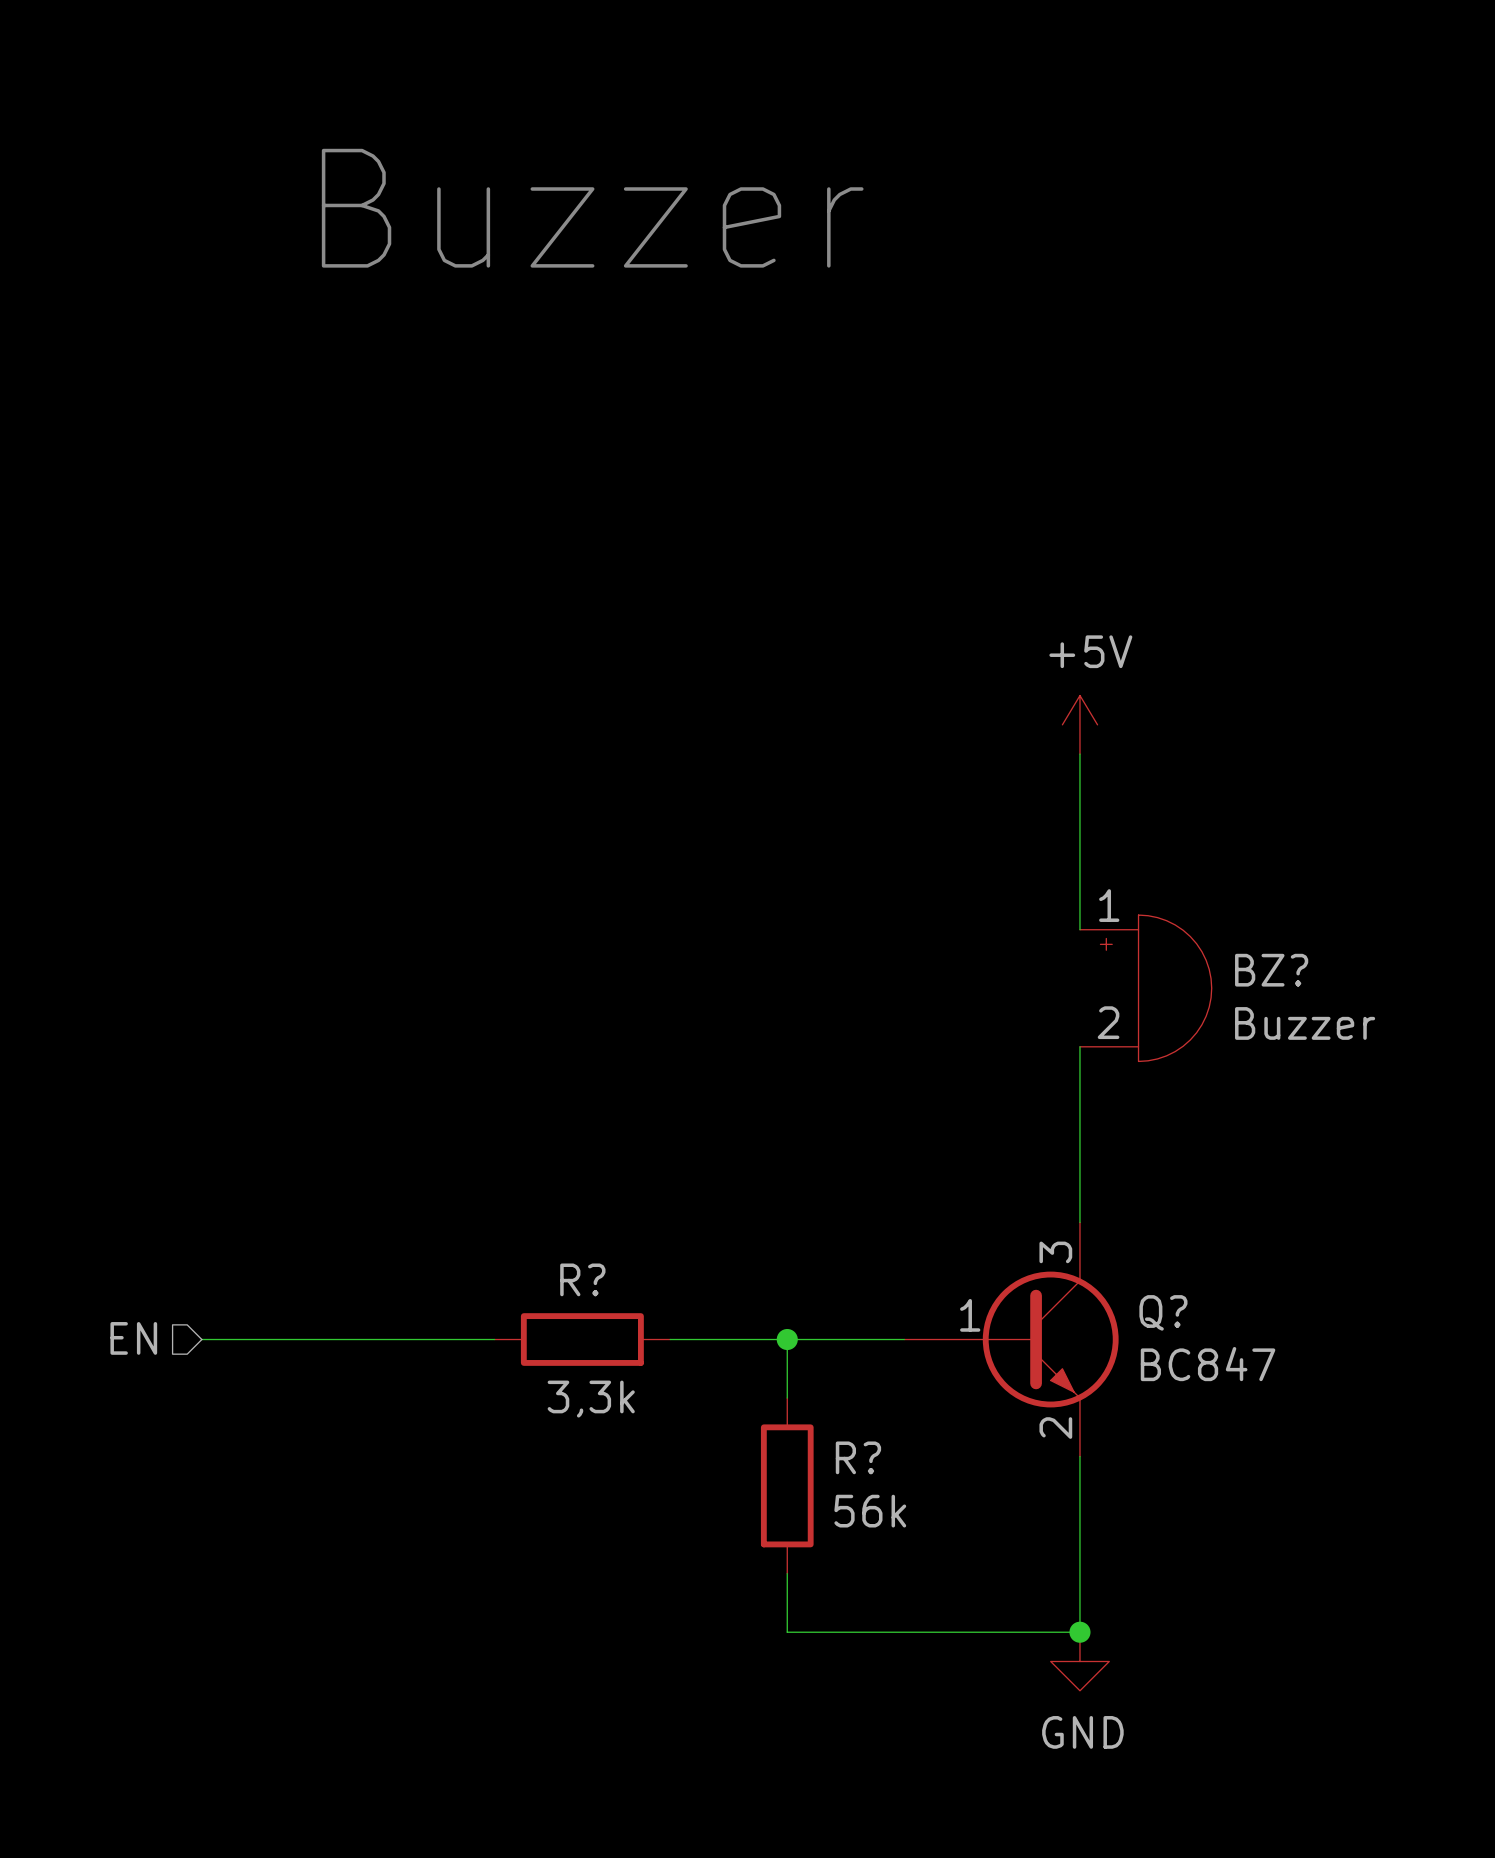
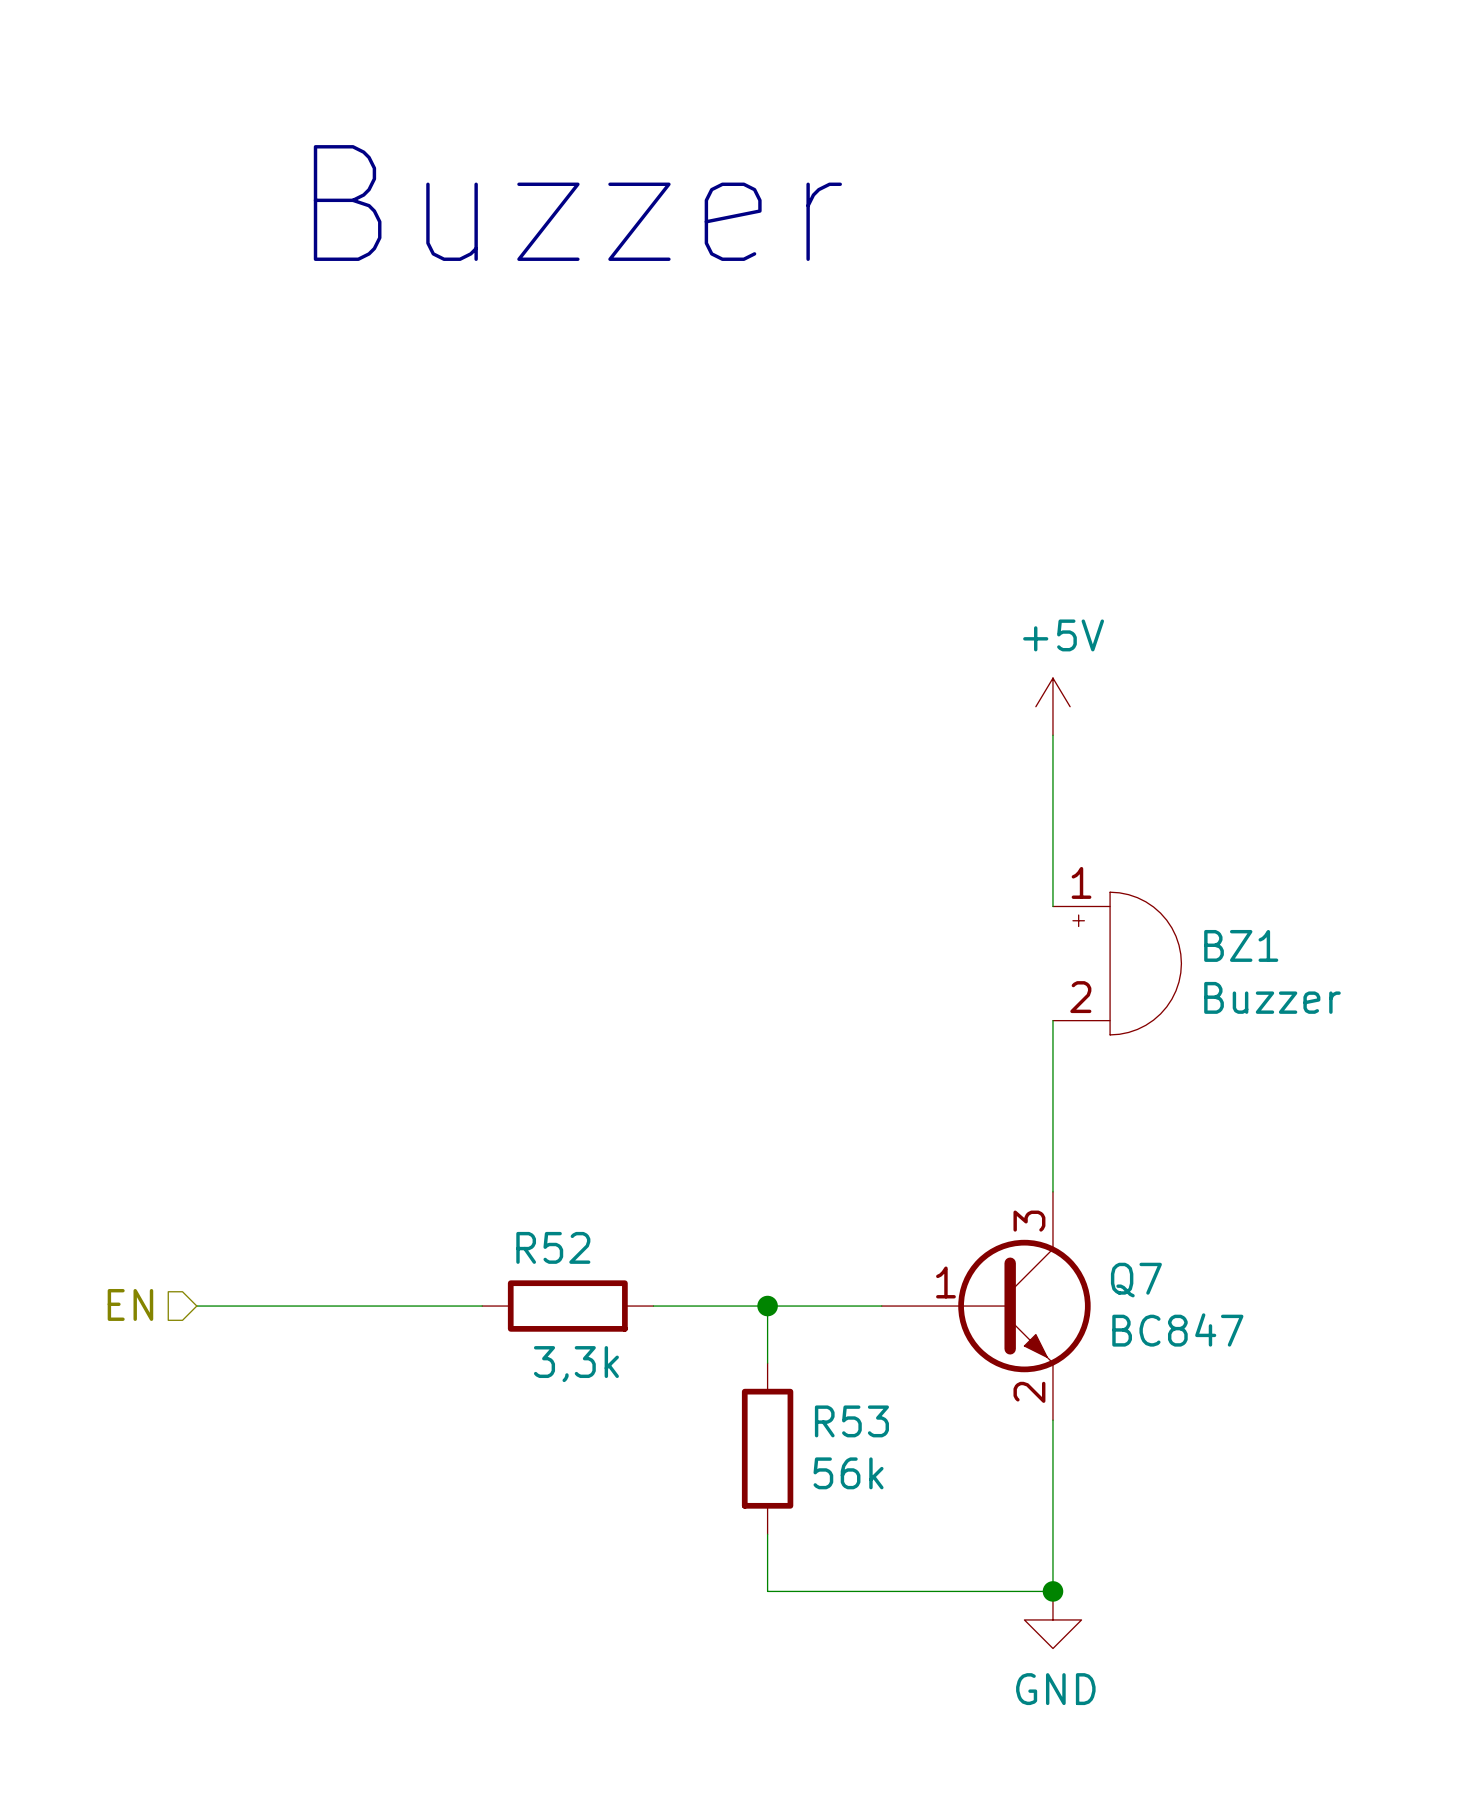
BZ? name: BZ? (1271, 970) -> BZ1 (1241, 945)
R? name: R? (582, 1279) -> R52 (553, 1247)
Q? name: Q? (1163, 1312) -> Q7 (1136, 1280)
R? name: R? (858, 1457) -> R53 (851, 1421)

